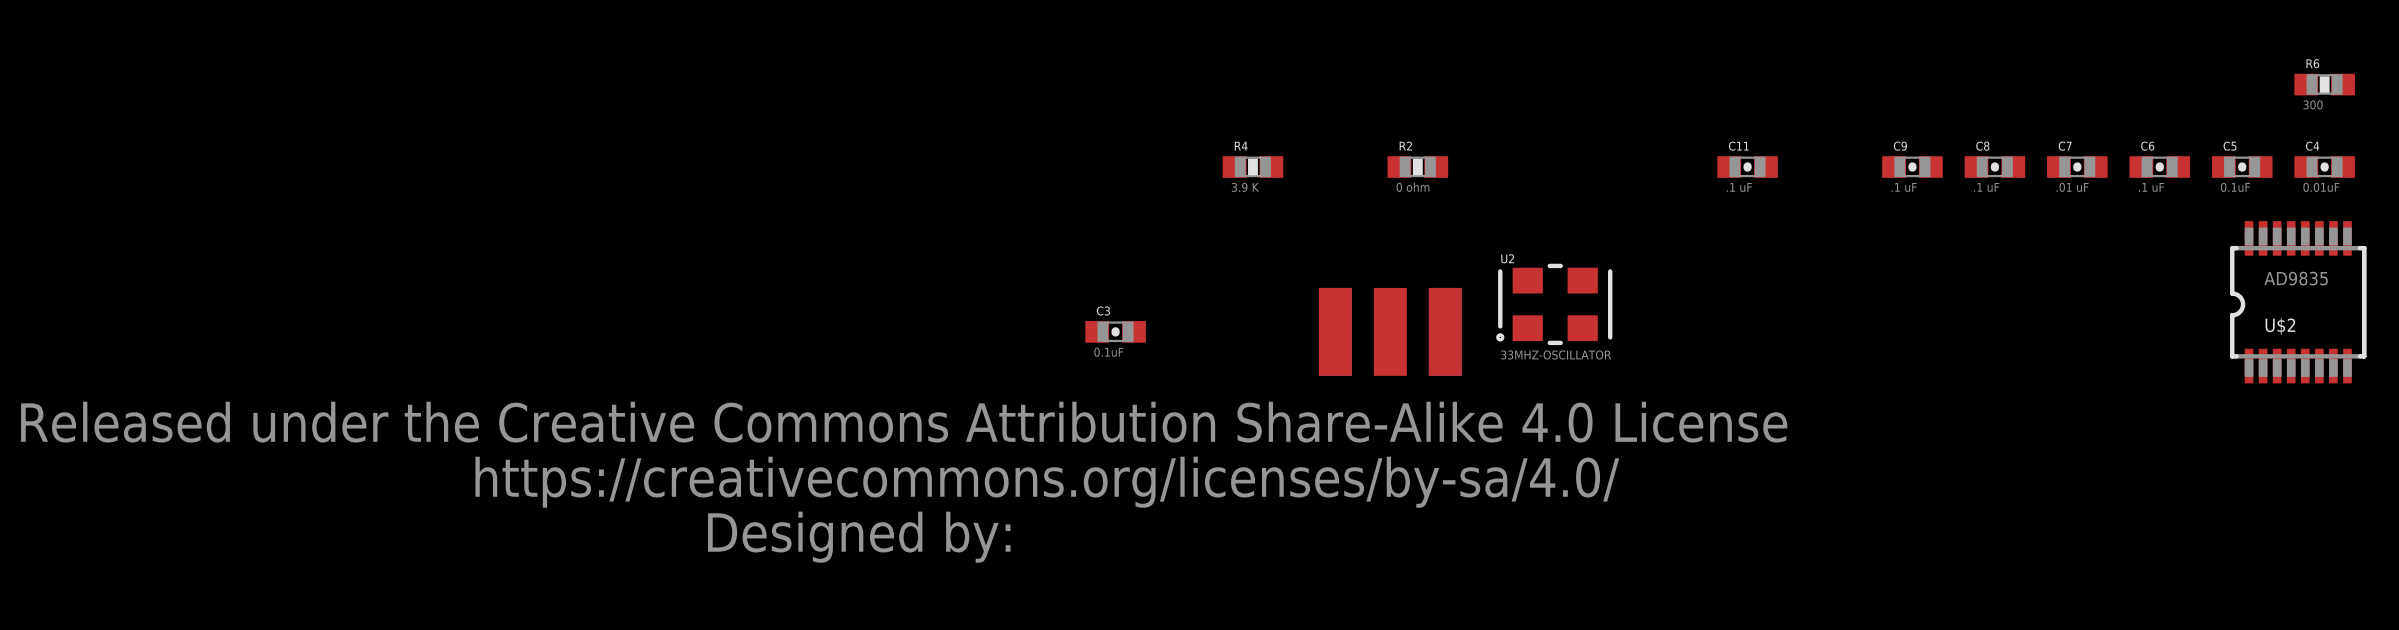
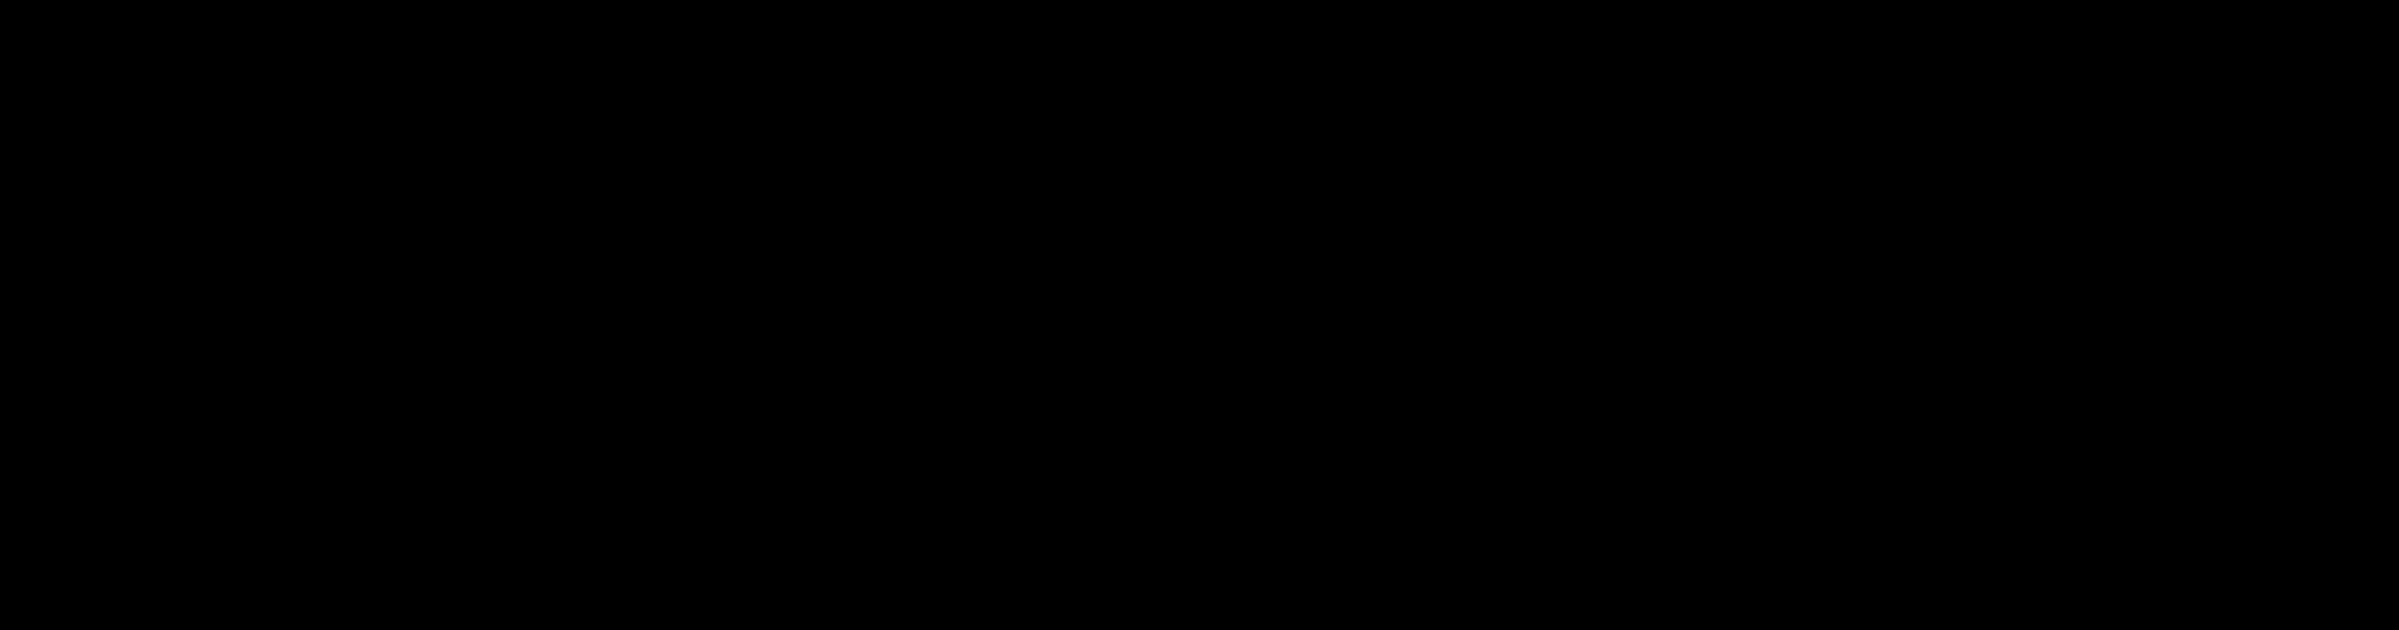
R6: 300 (2324, 84) -> none
R4: 3.9 K (1252, 167) -> none
R2: 0 ohm (1417, 167) -> none
C11: .1 uF (1747, 167) -> none
C9: .1 uF (1912, 167) -> none
C8: .1 uF (1994, 167) -> none
C7: .01 uF (2077, 167) -> none
C6: .1 uF (2159, 167) -> none
C5: 0.1uF (2242, 167) -> none
C4: 0.01uF (2324, 167) -> none
U$2: AD9835 (2298, 302) -> none
U2: 33MHZ-OSCILLATOR (1554, 304) -> none
C3: 0.1uF (1115, 331) -> none
part: (1390, 331) -> none
drawing: [21, 401, 1788, 563] -> none

